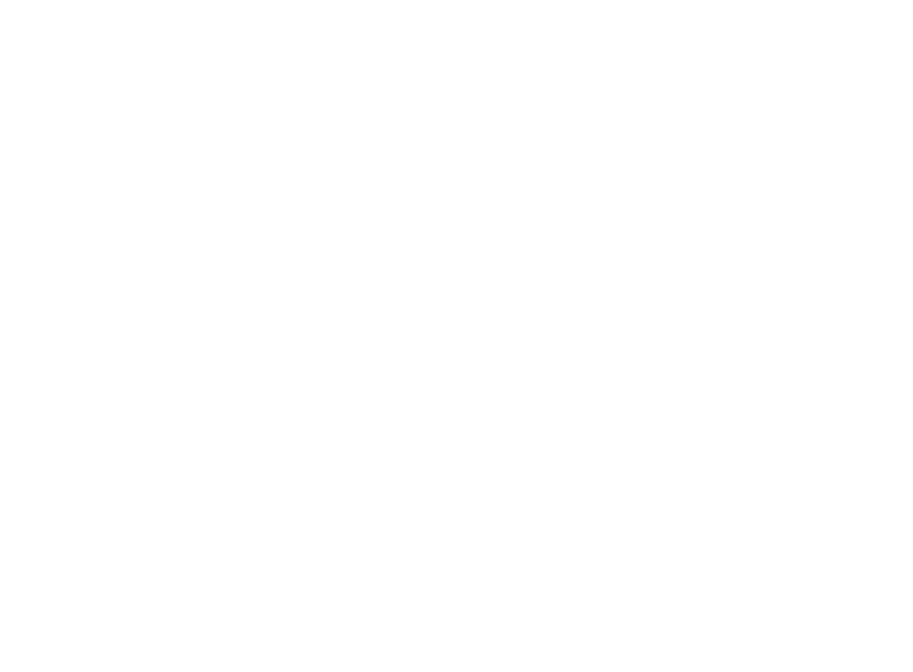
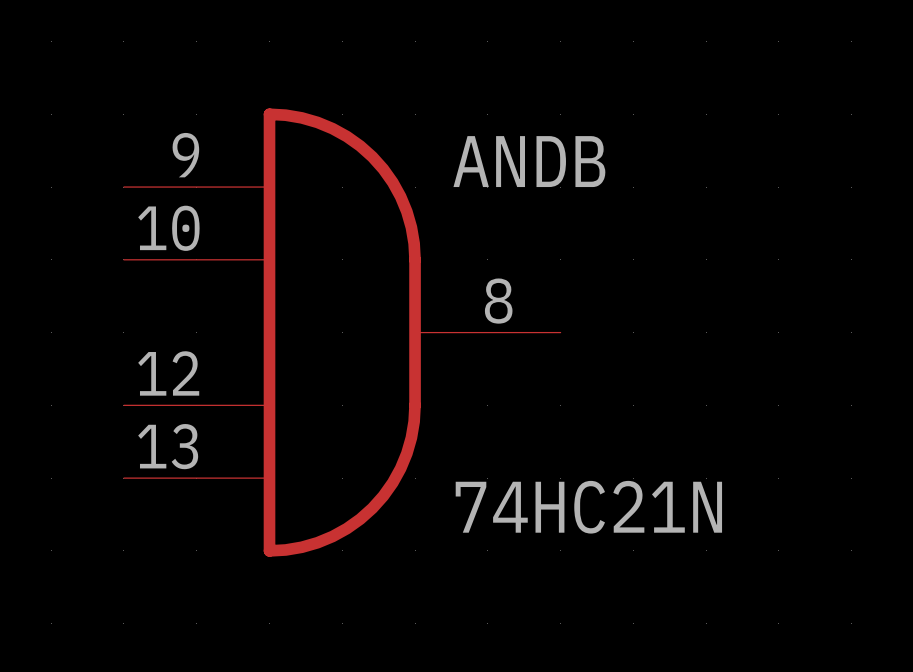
ANDB: none -> 74HC21N (342, 332)

